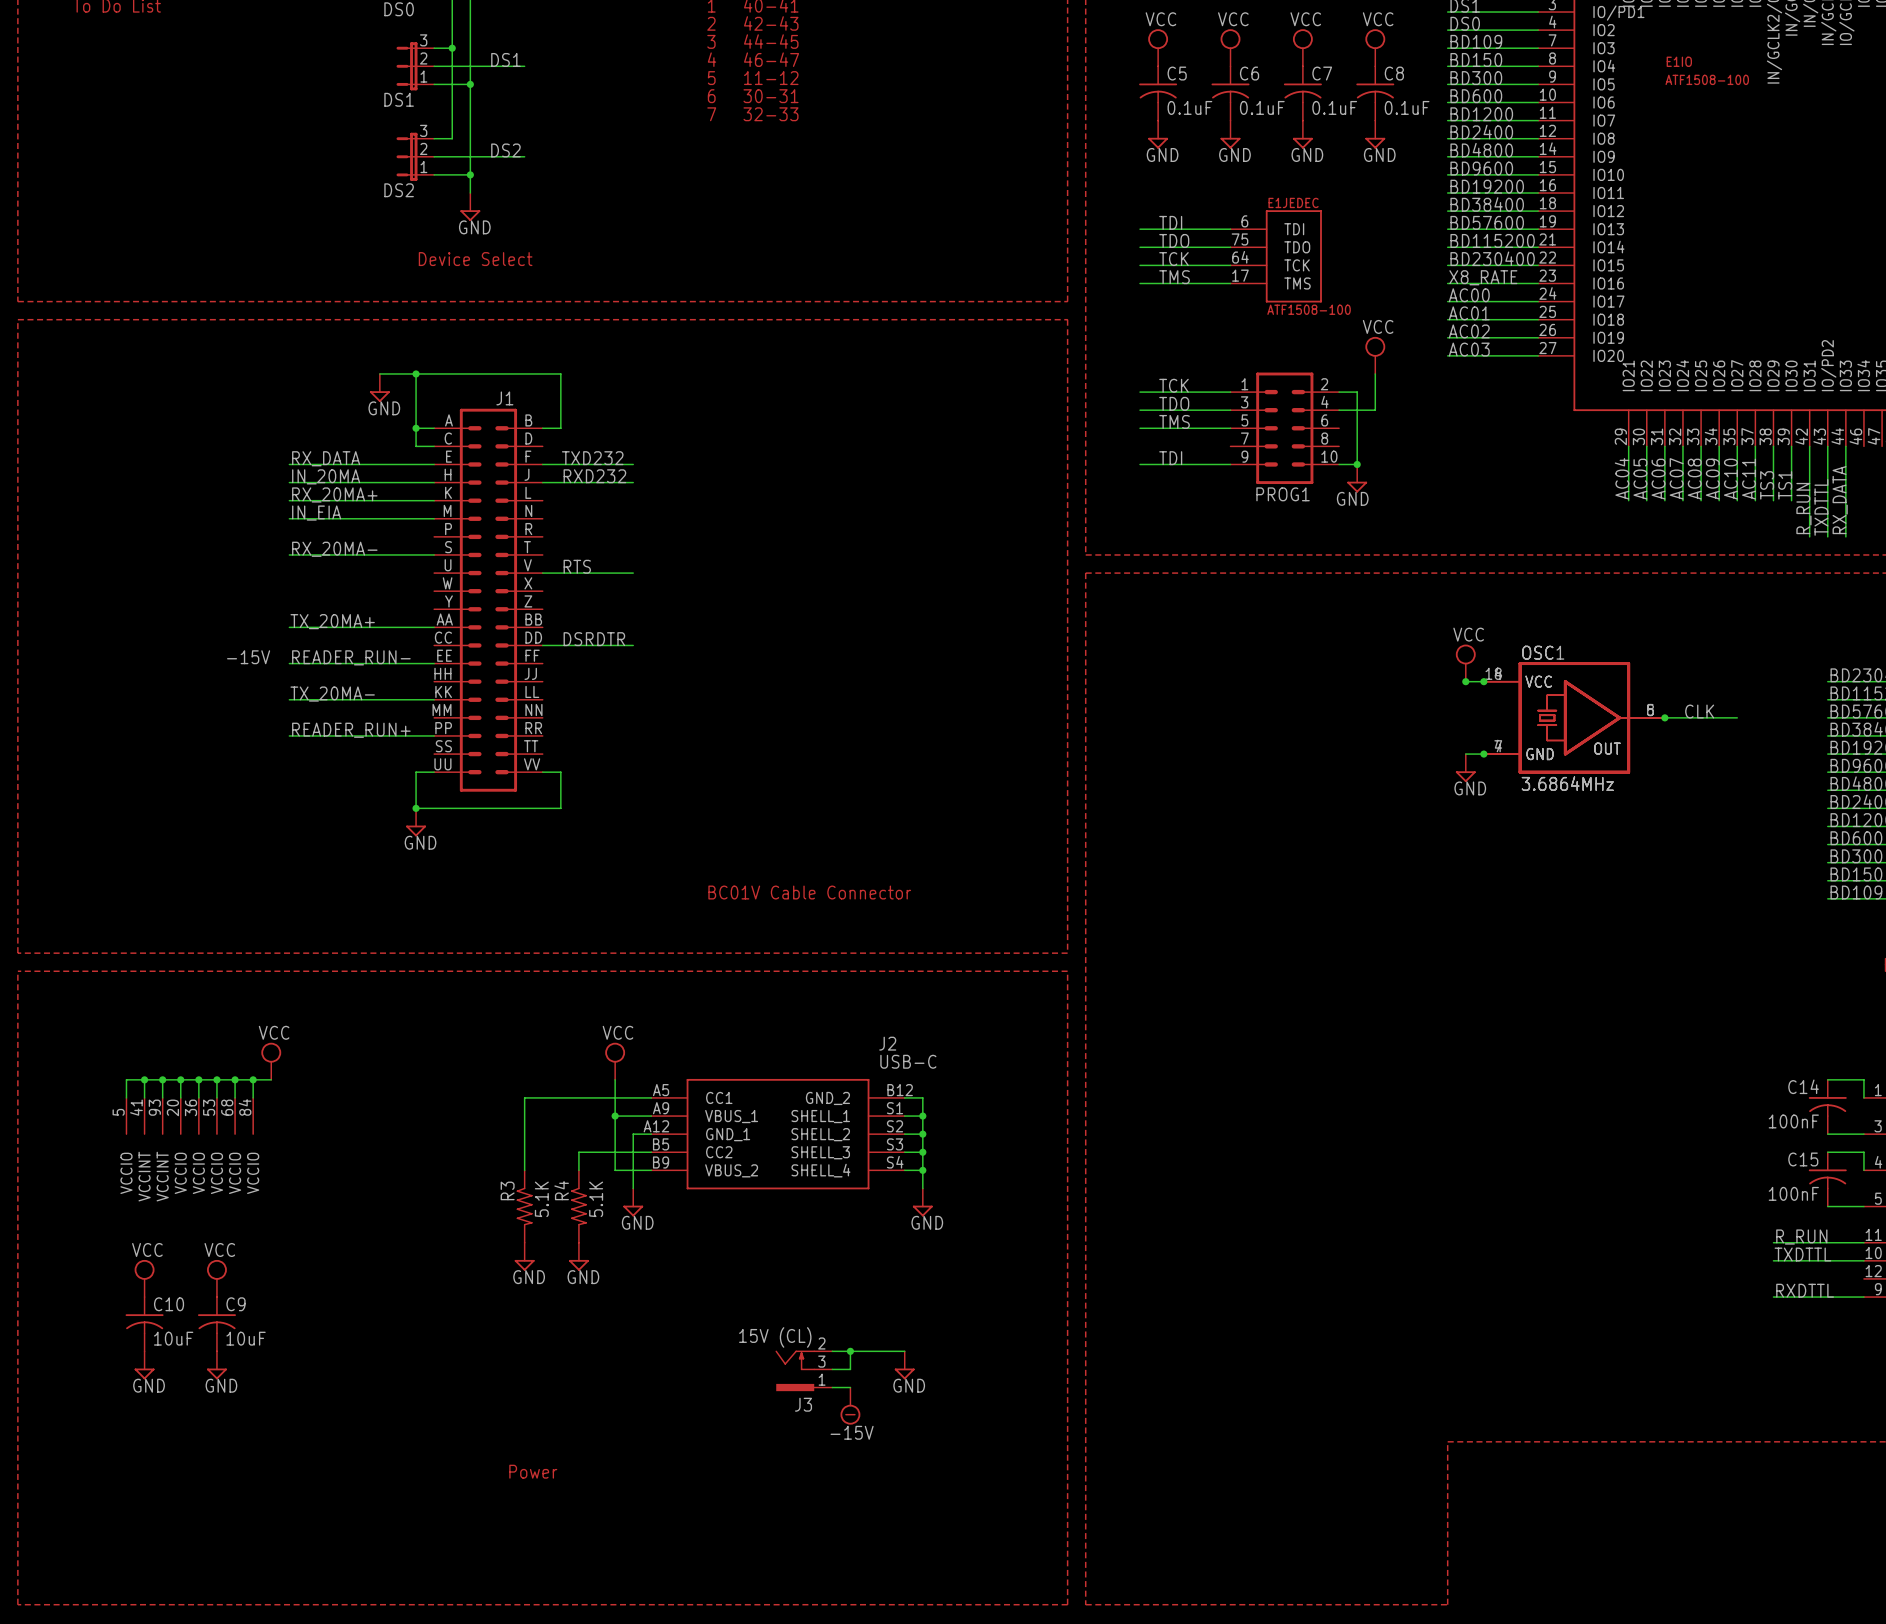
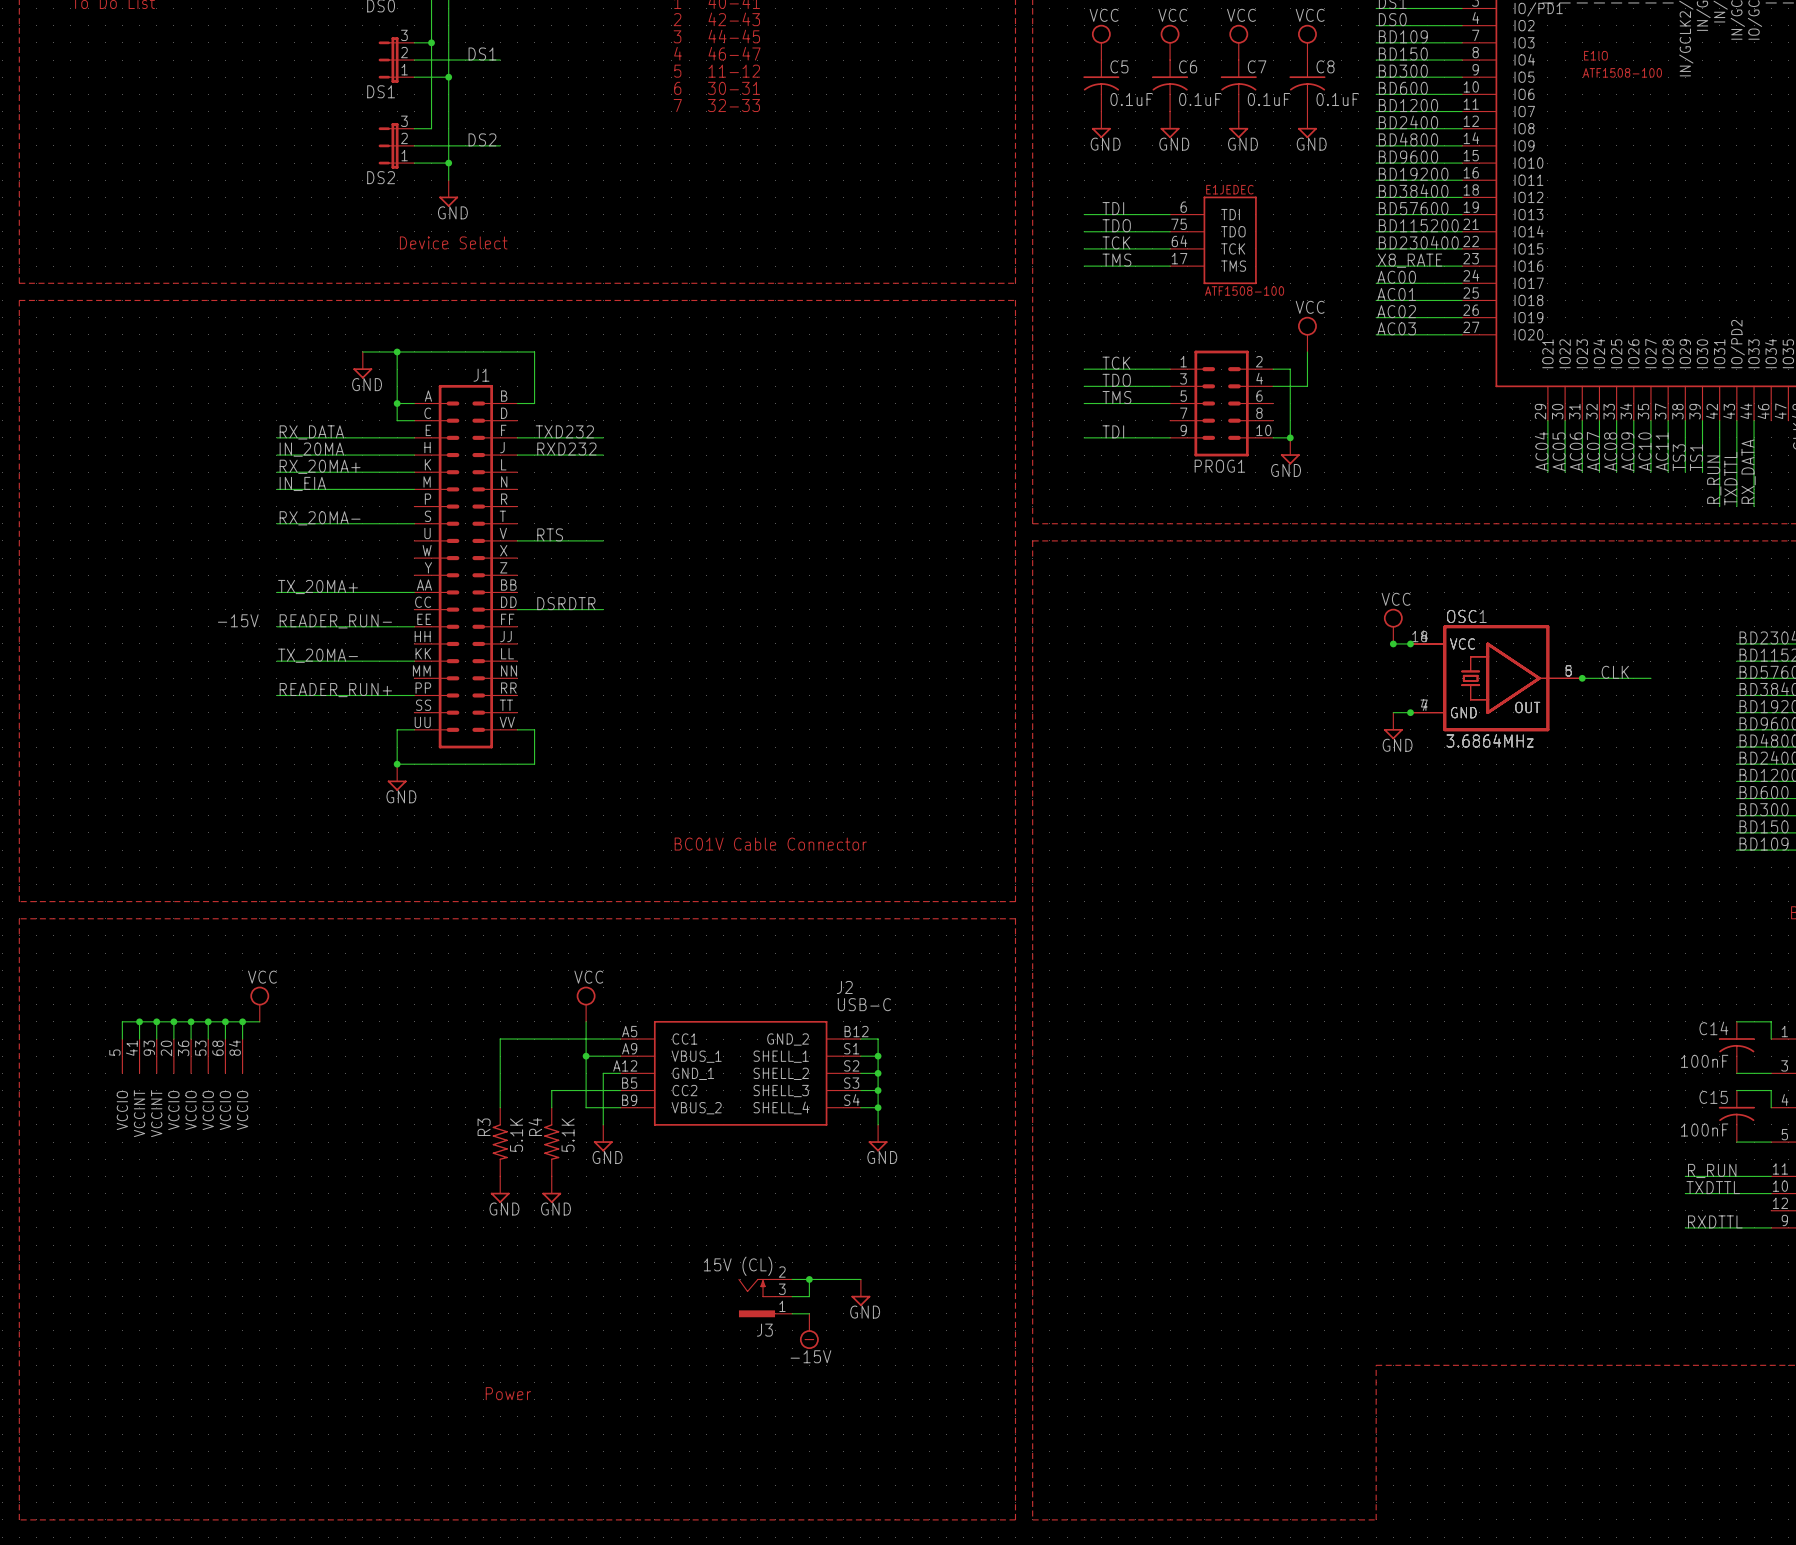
power symbol: VCC (144, 1278) -> none
power symbol: VCC (216, 1278) -> none
C10: 10uF (144, 1324) -> none
C9: 10uF (216, 1324) -> none
power symbol: GND (144, 1365) -> none
power symbol: GND (216, 1365) -> none

